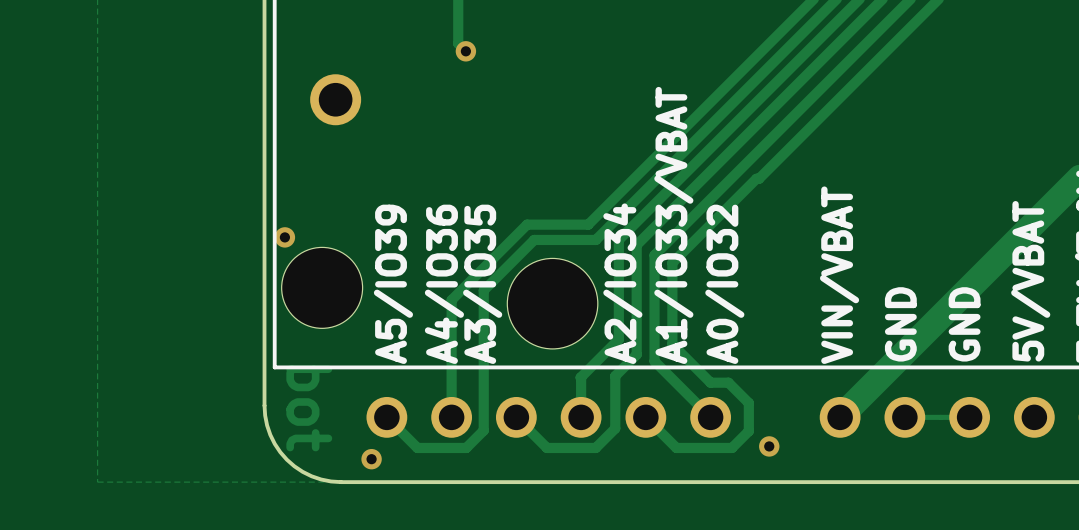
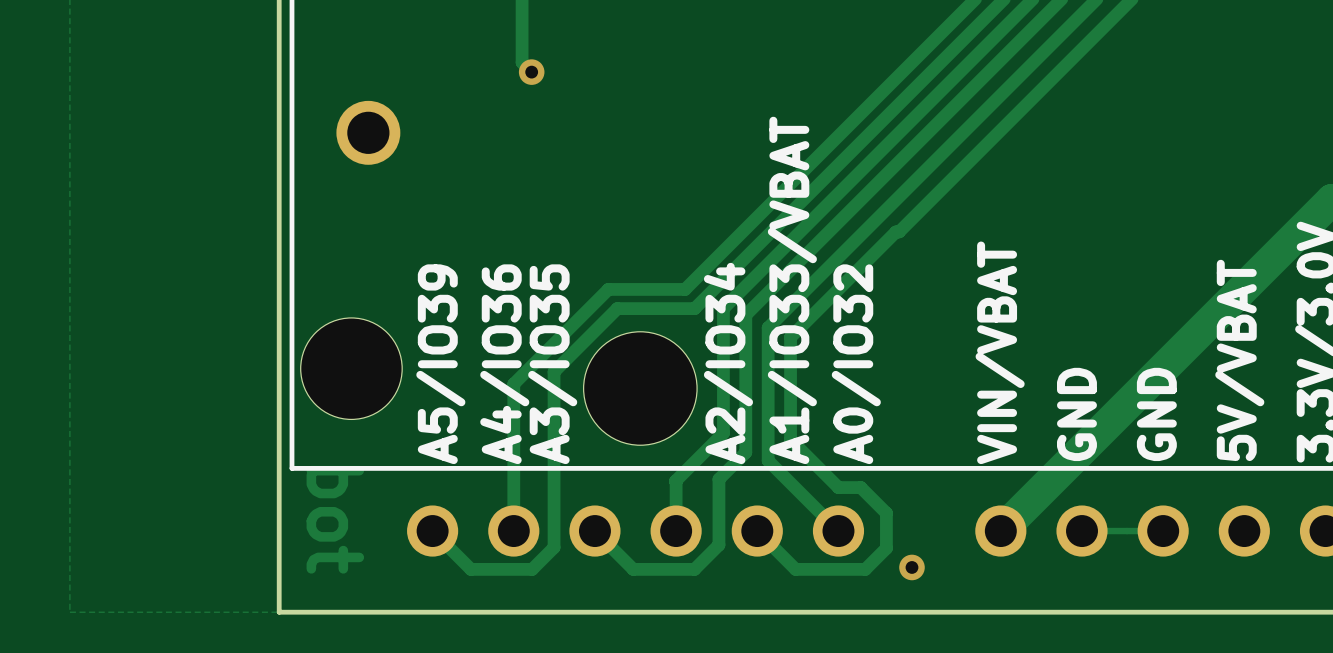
via: (284, 237) -> none
board edge: (264, 405) (270, 434) (286, 459) (311, 476) (340, 482) -> (279, 516) (279, 612) (375, 612)
via: (371, 459) -> none

